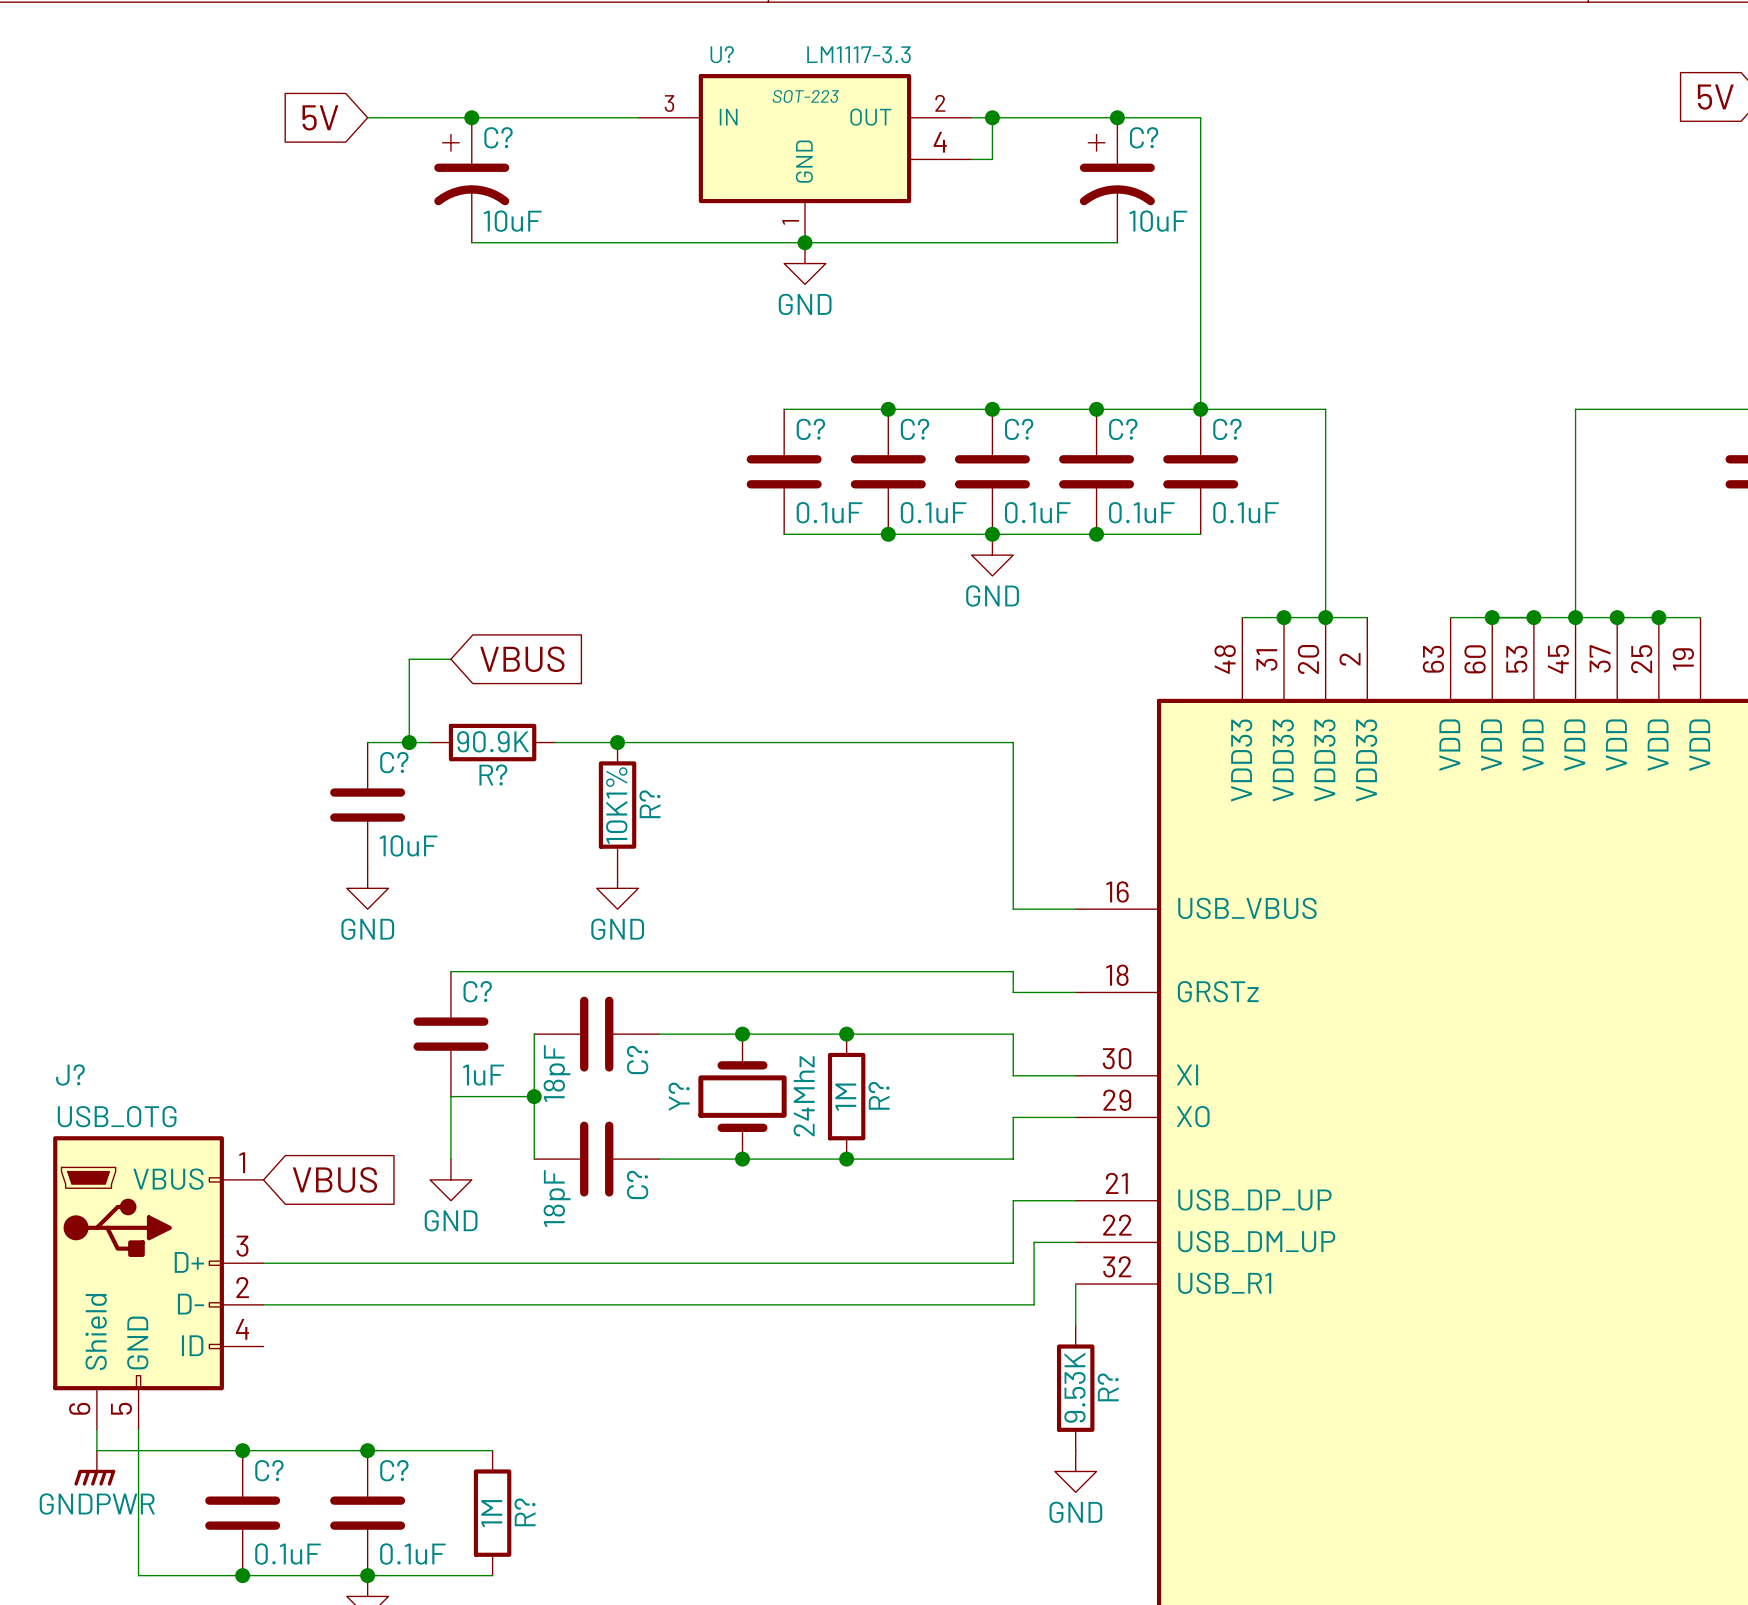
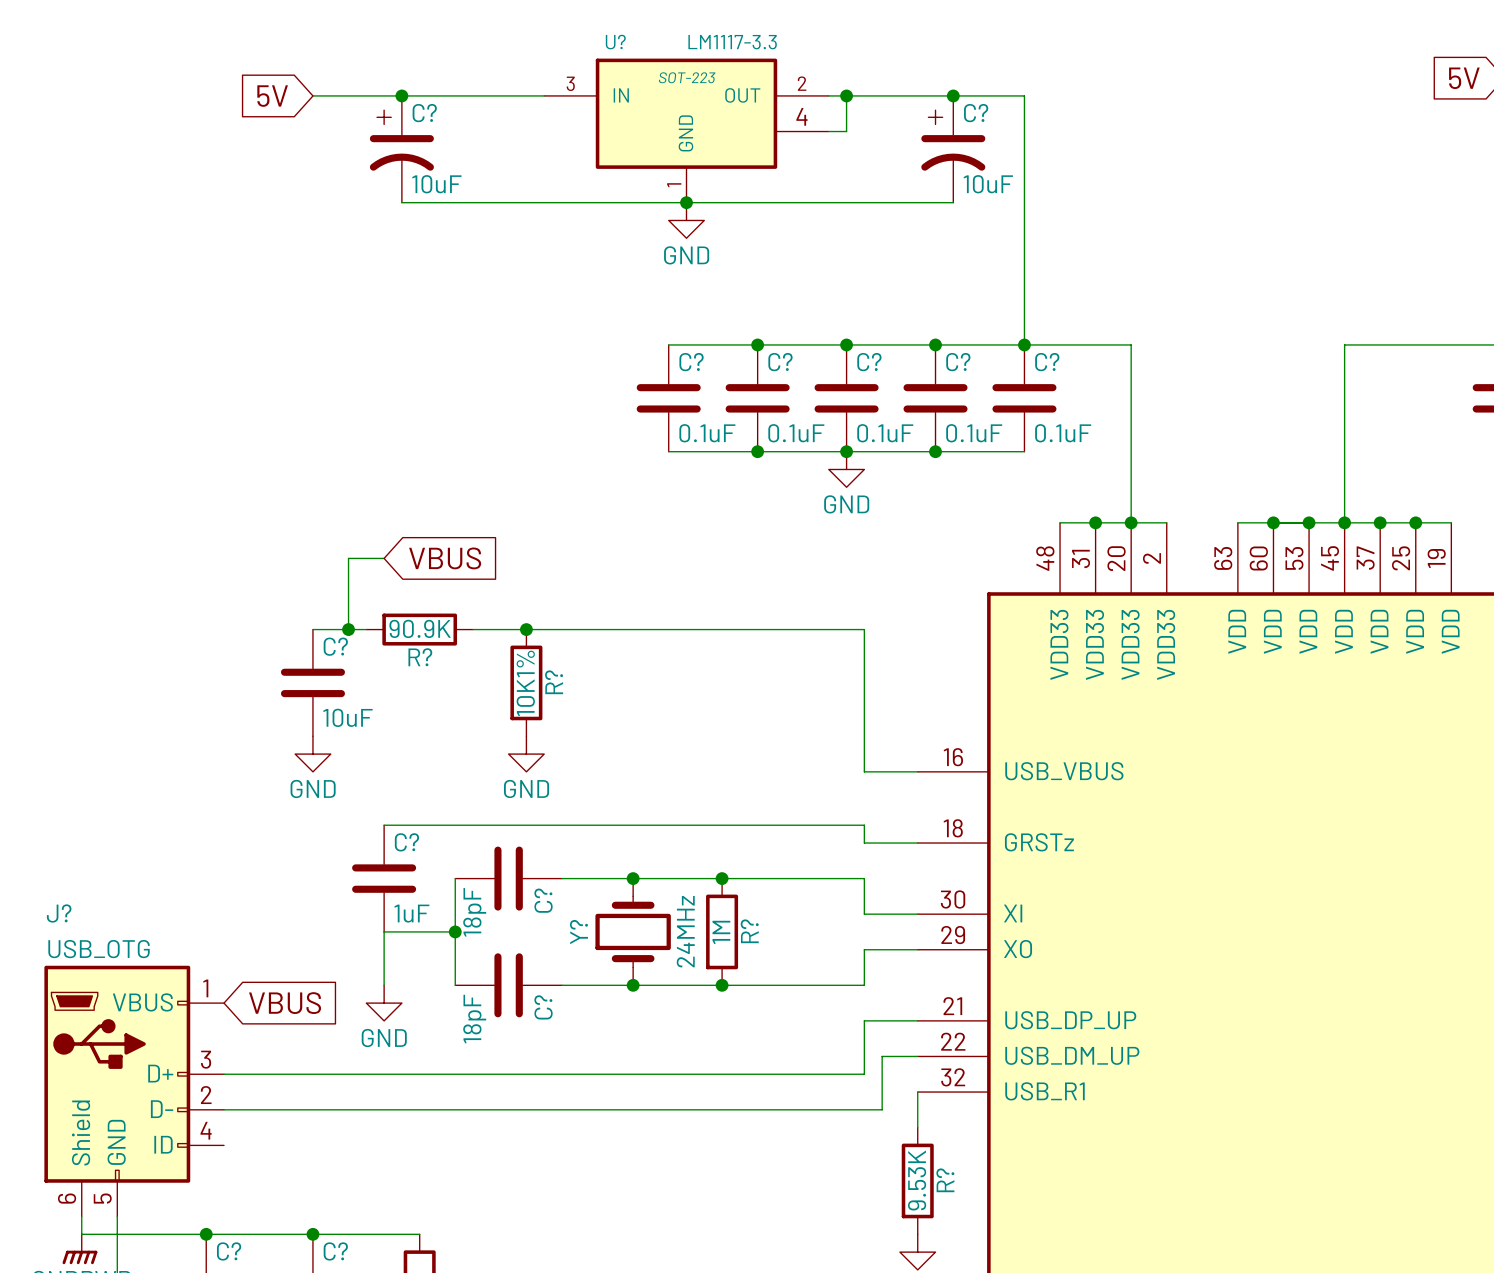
Y? value: 24Mhz (804, 1096) -> 24MHz (685, 931)

